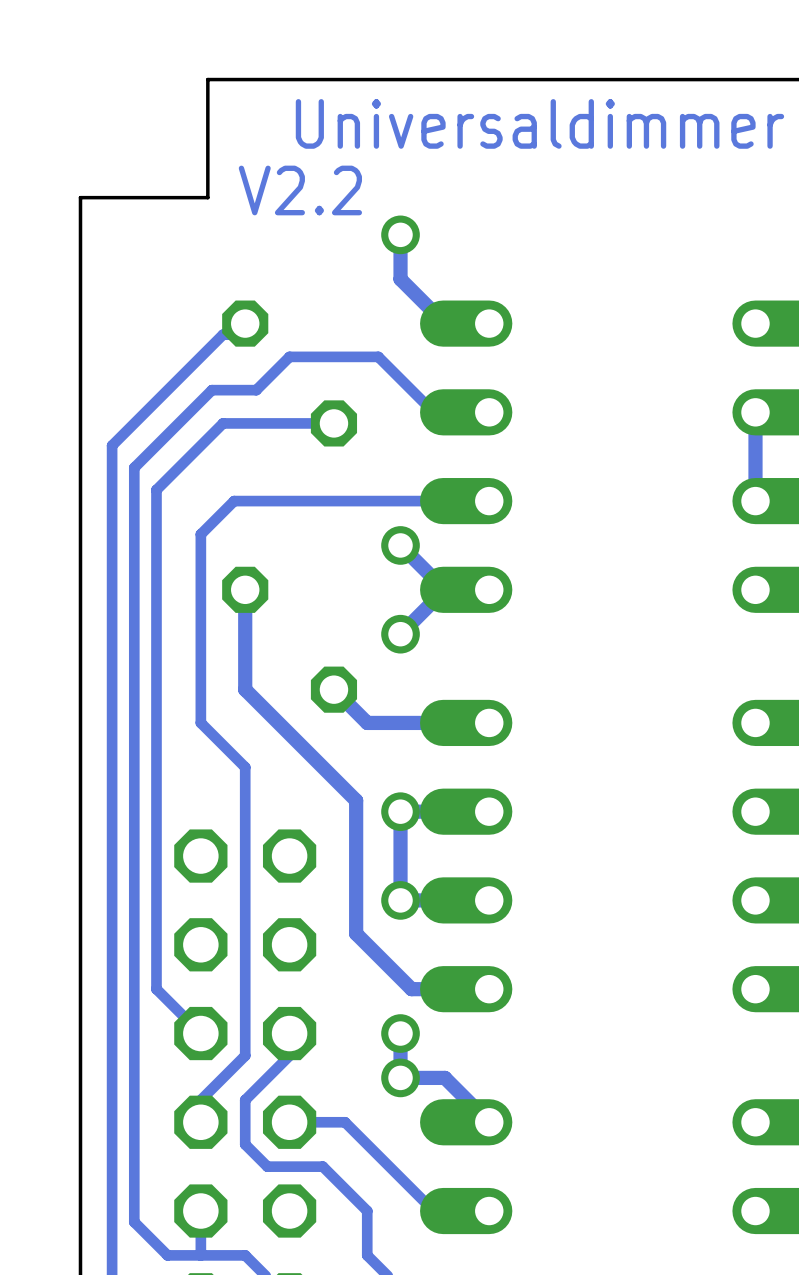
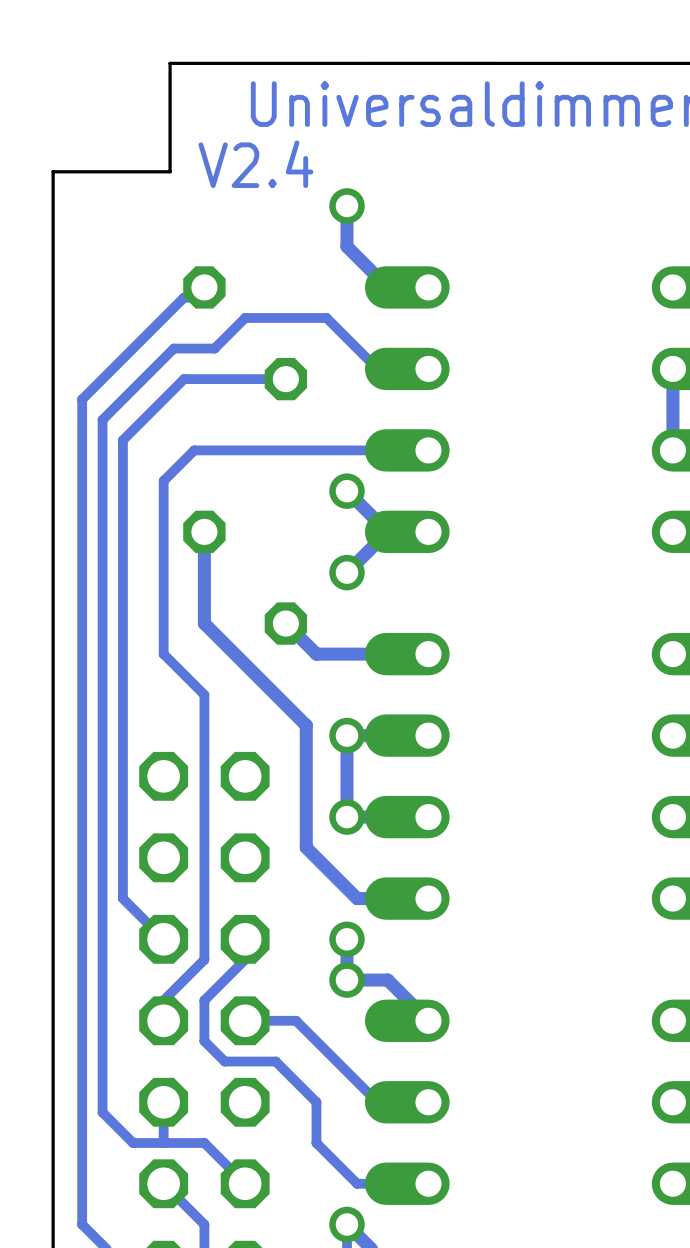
text: V2.2 (300, 190) -> V2.4 (255, 164)

